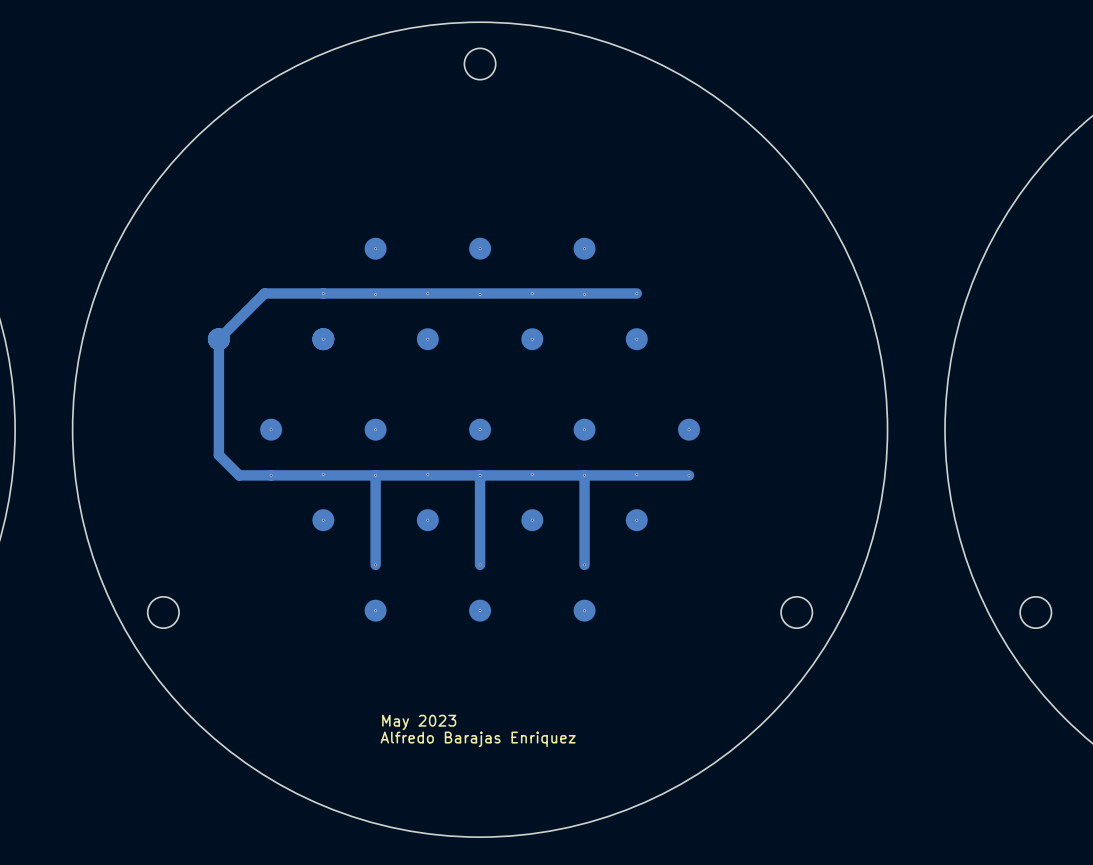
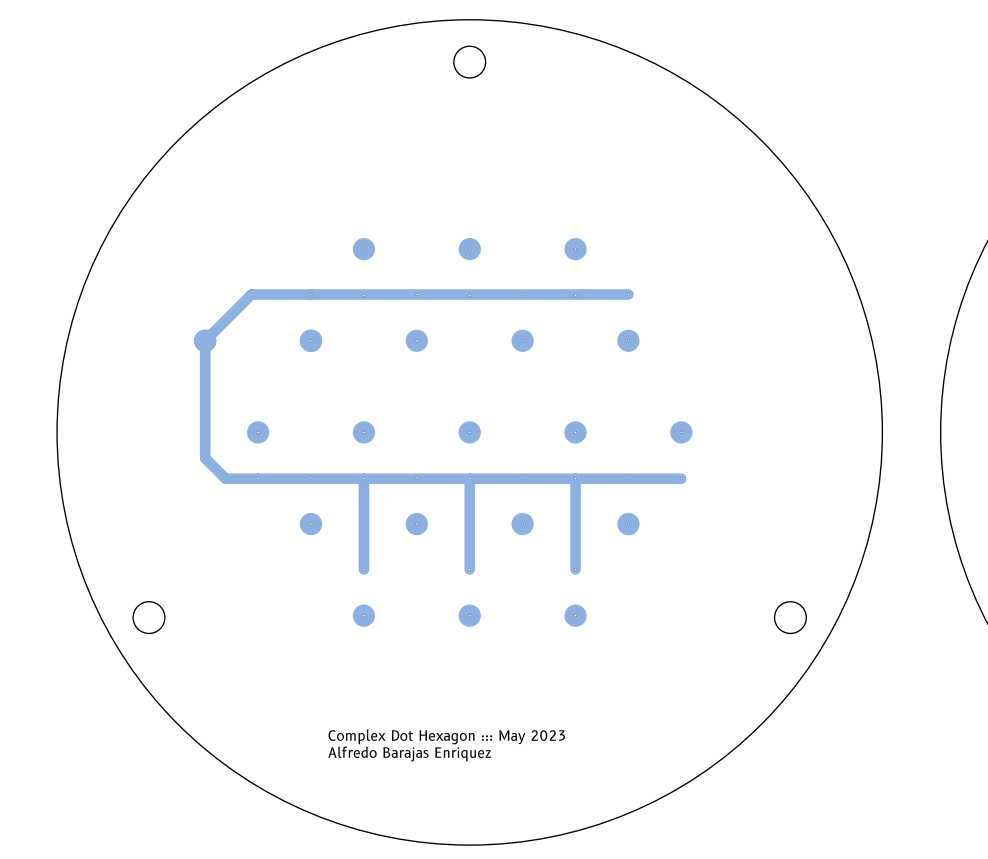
text: May 2023 (419, 722) -> none
text: none -> Complex Dot Hexagon ::: May 2023 (446, 736)
text position: Alfredo Barajas Enriquez (478, 739) -> Alfredo Barajas Enriquez (409, 753)

